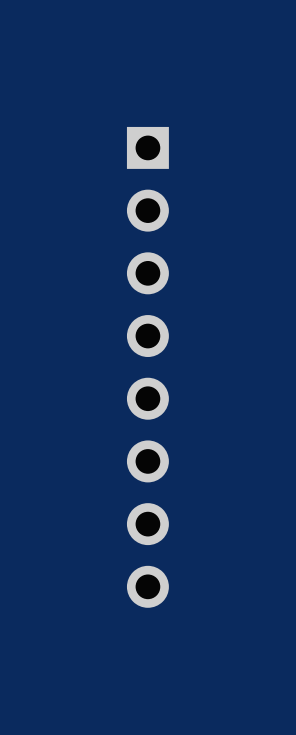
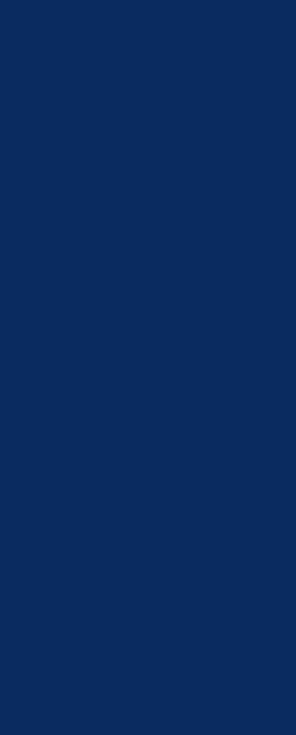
part: (147, 367) -> none

